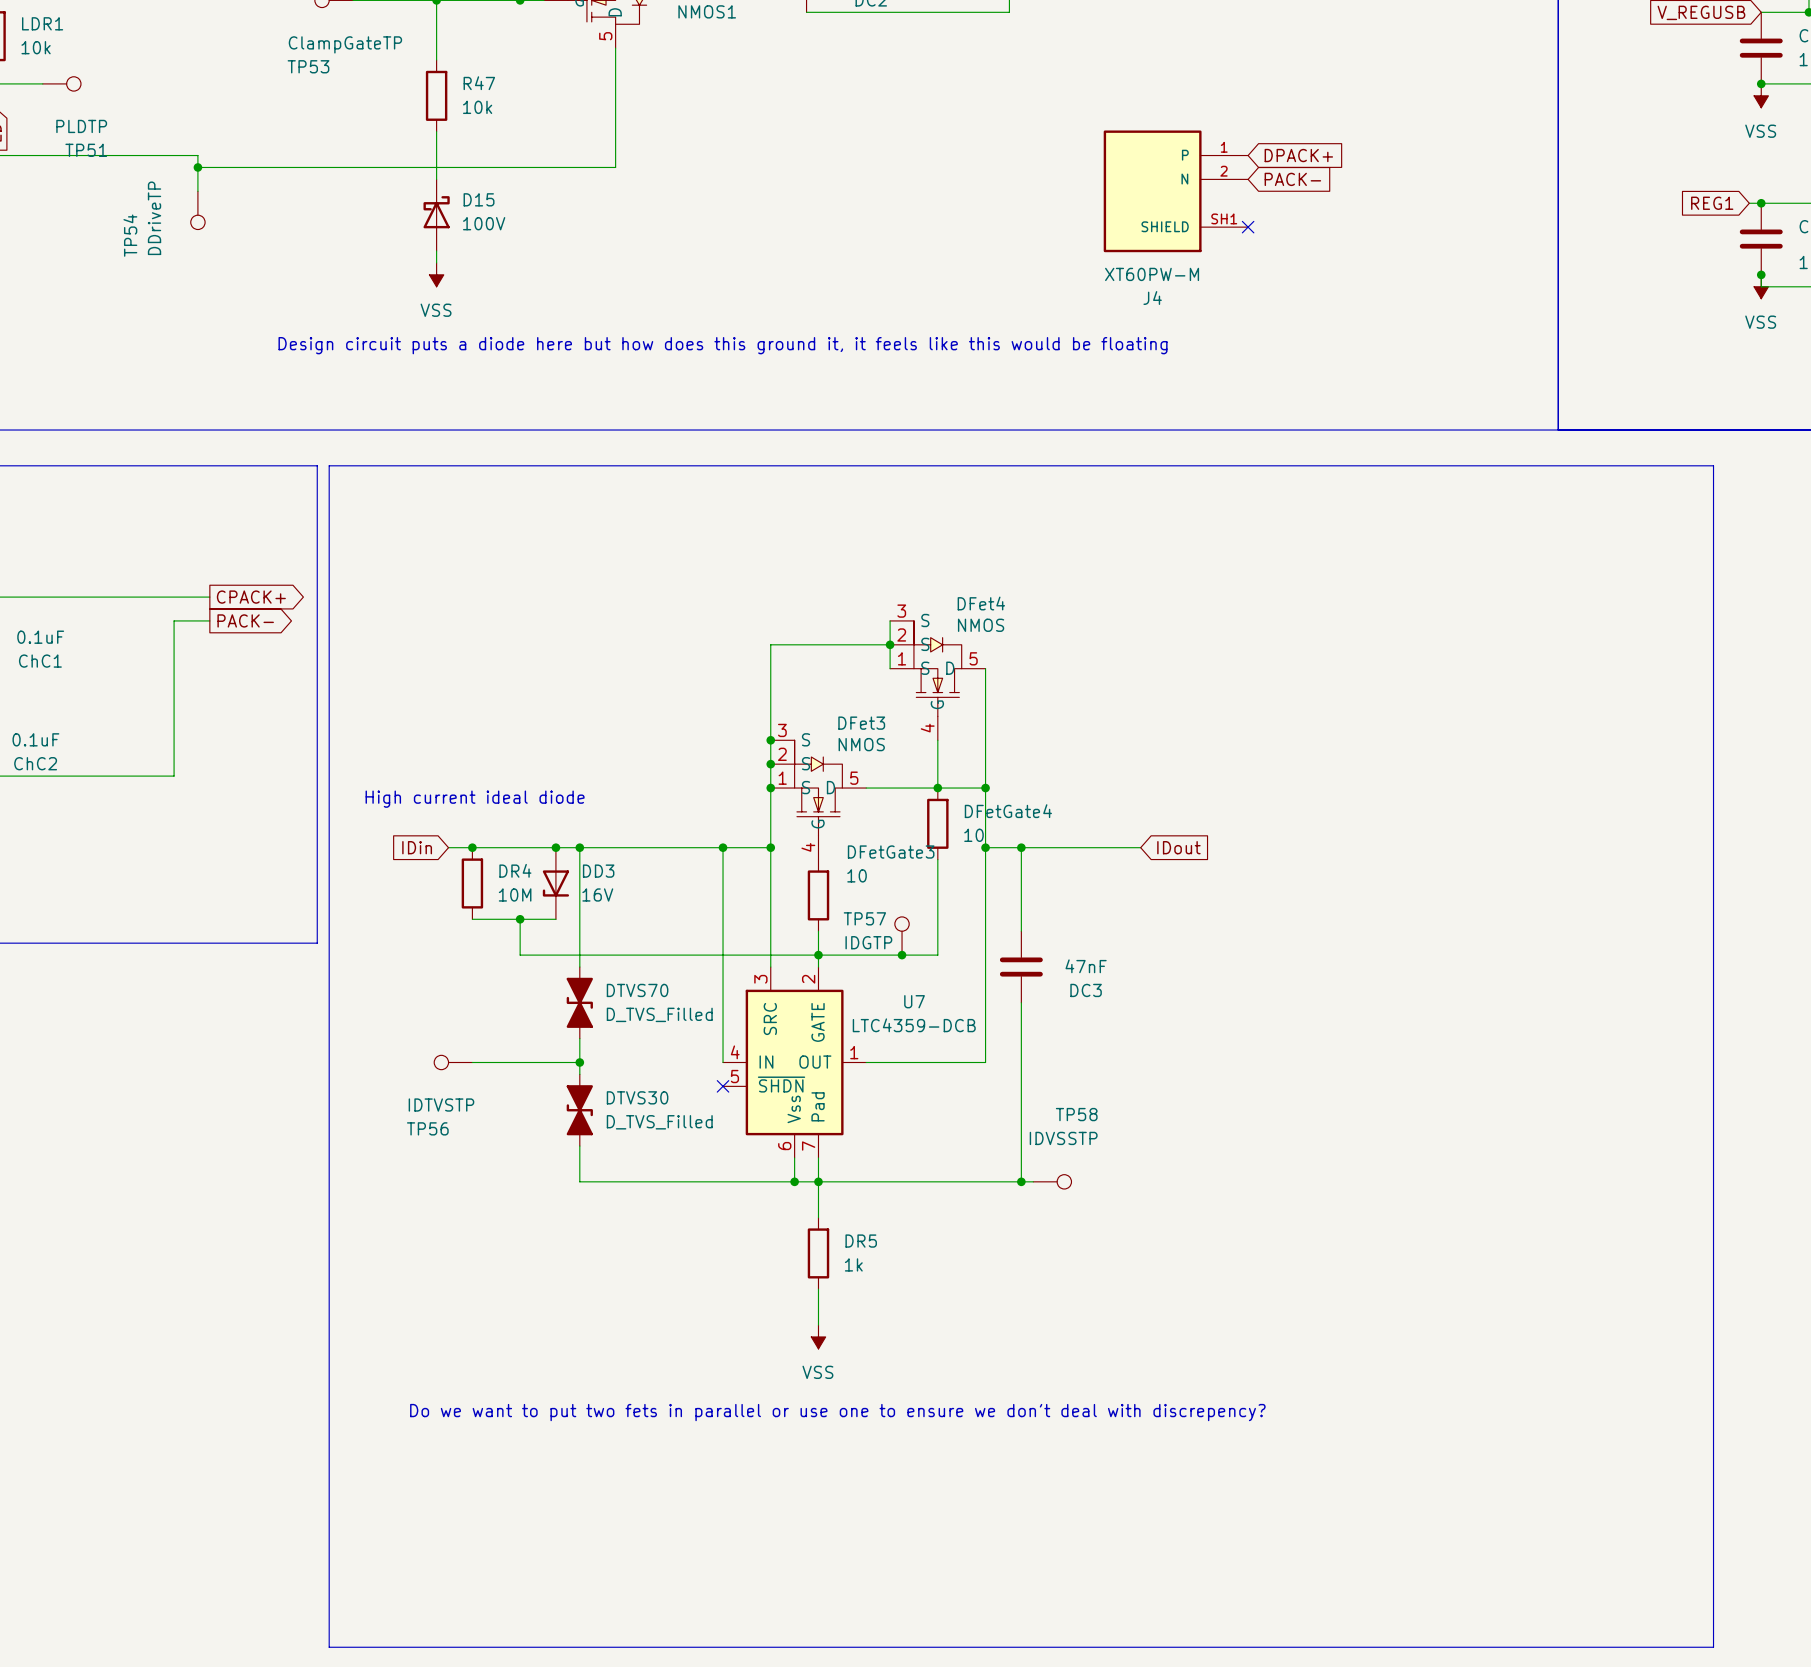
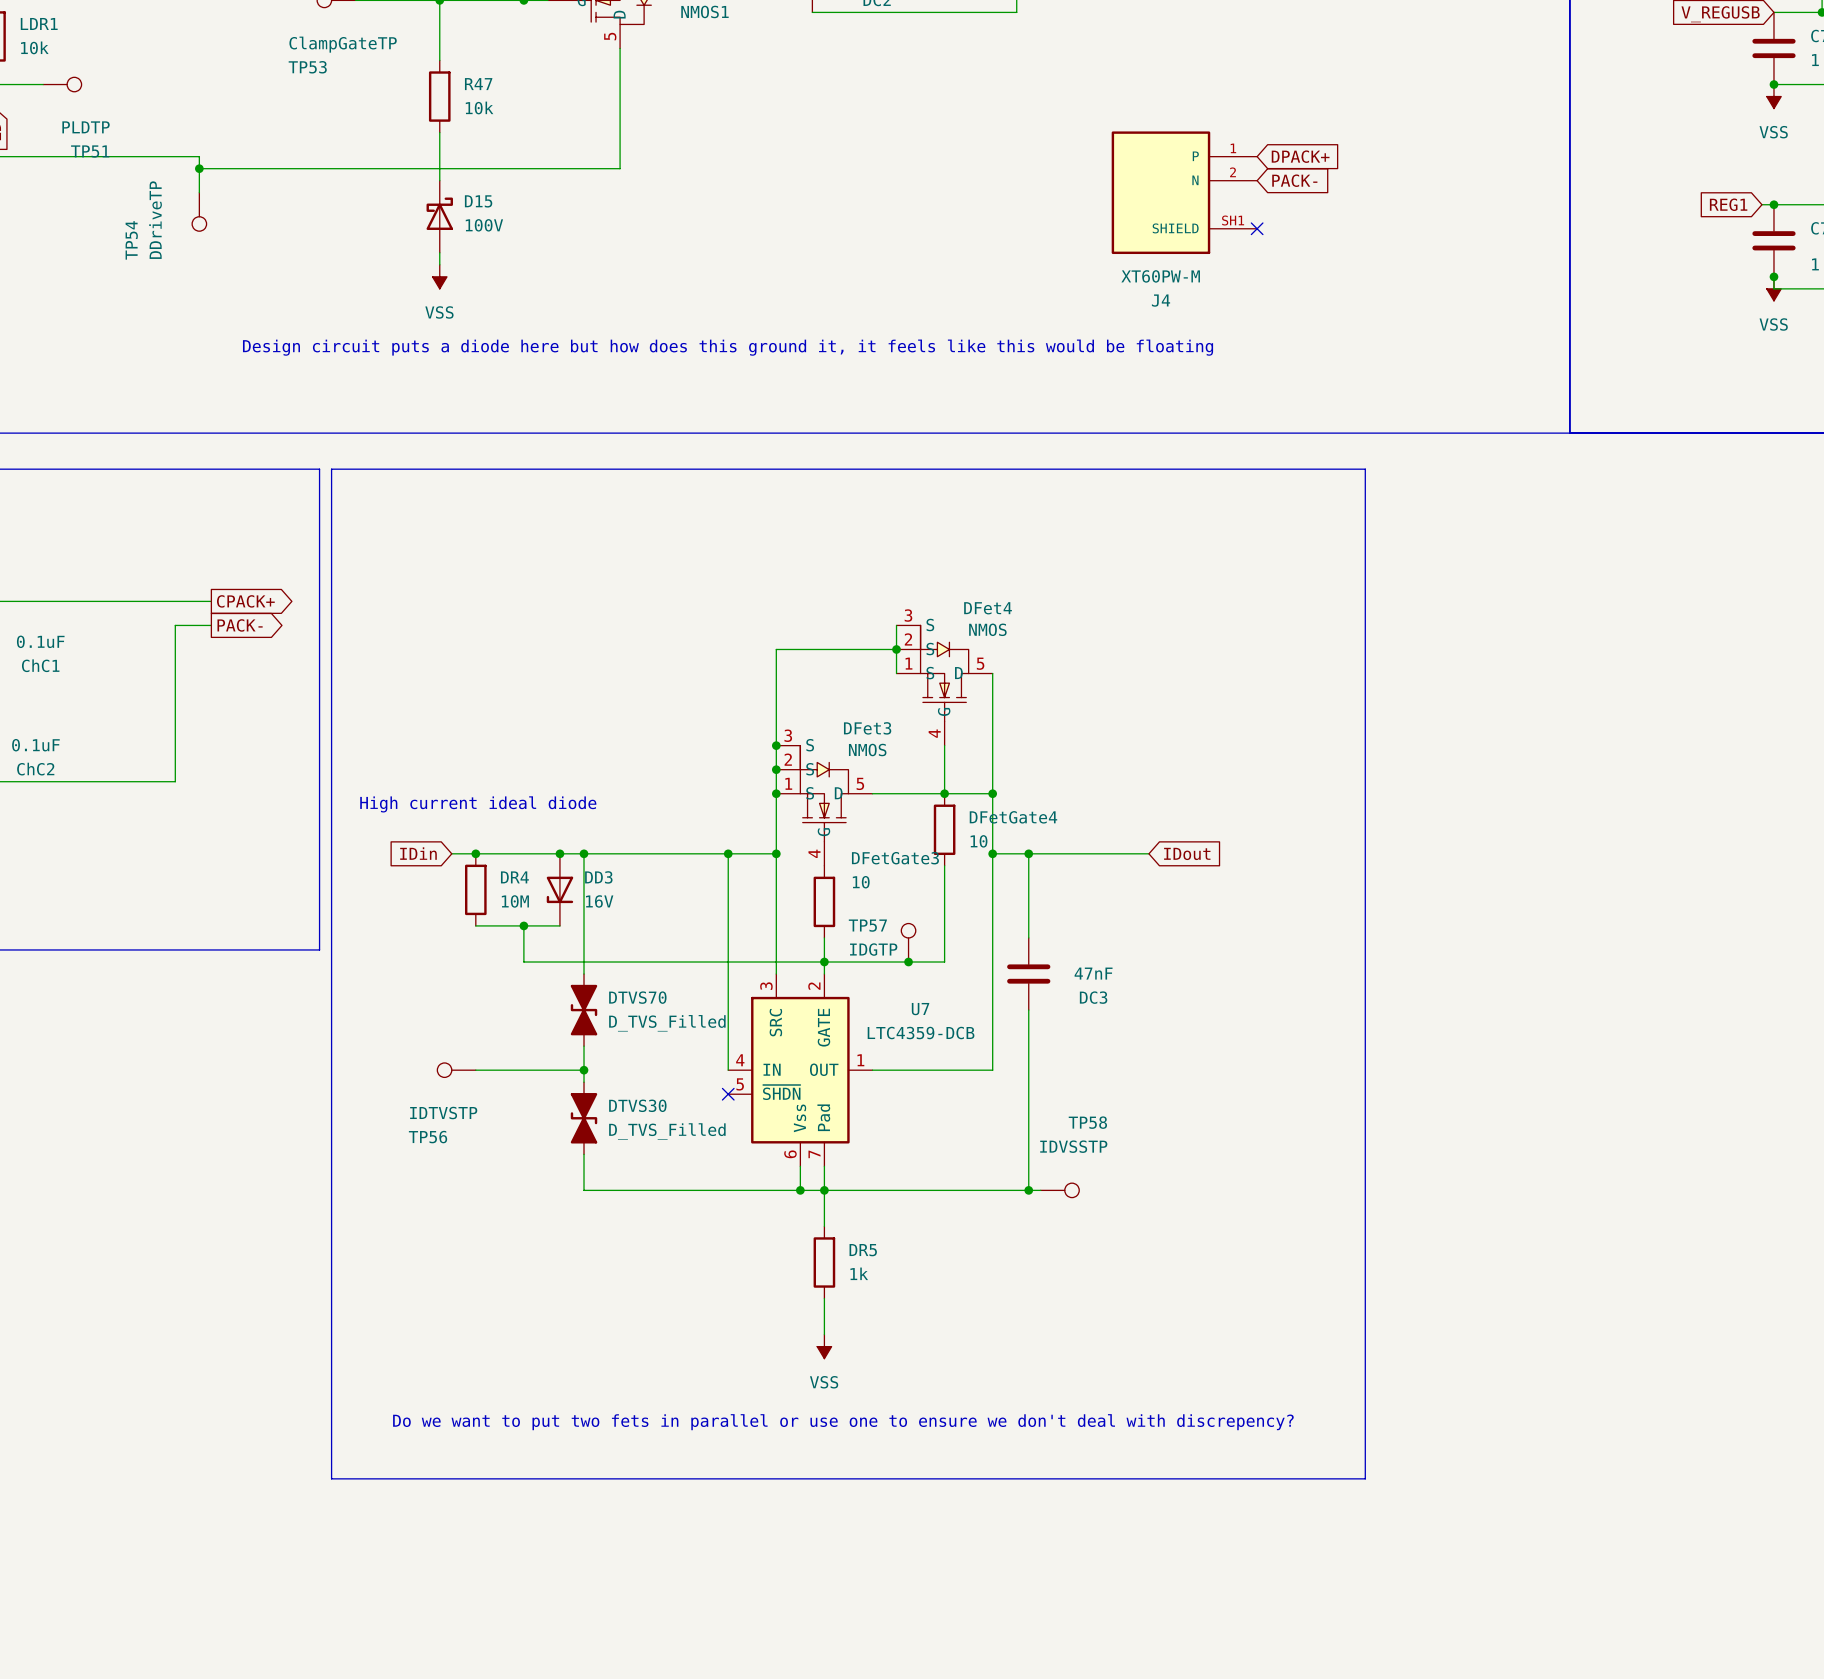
line: (1355, 465) (1713, 465) (1713, 1647) (329, 1647) (329, 1468) -> (1365, 469) (1365, 1478) (331, 1478)

